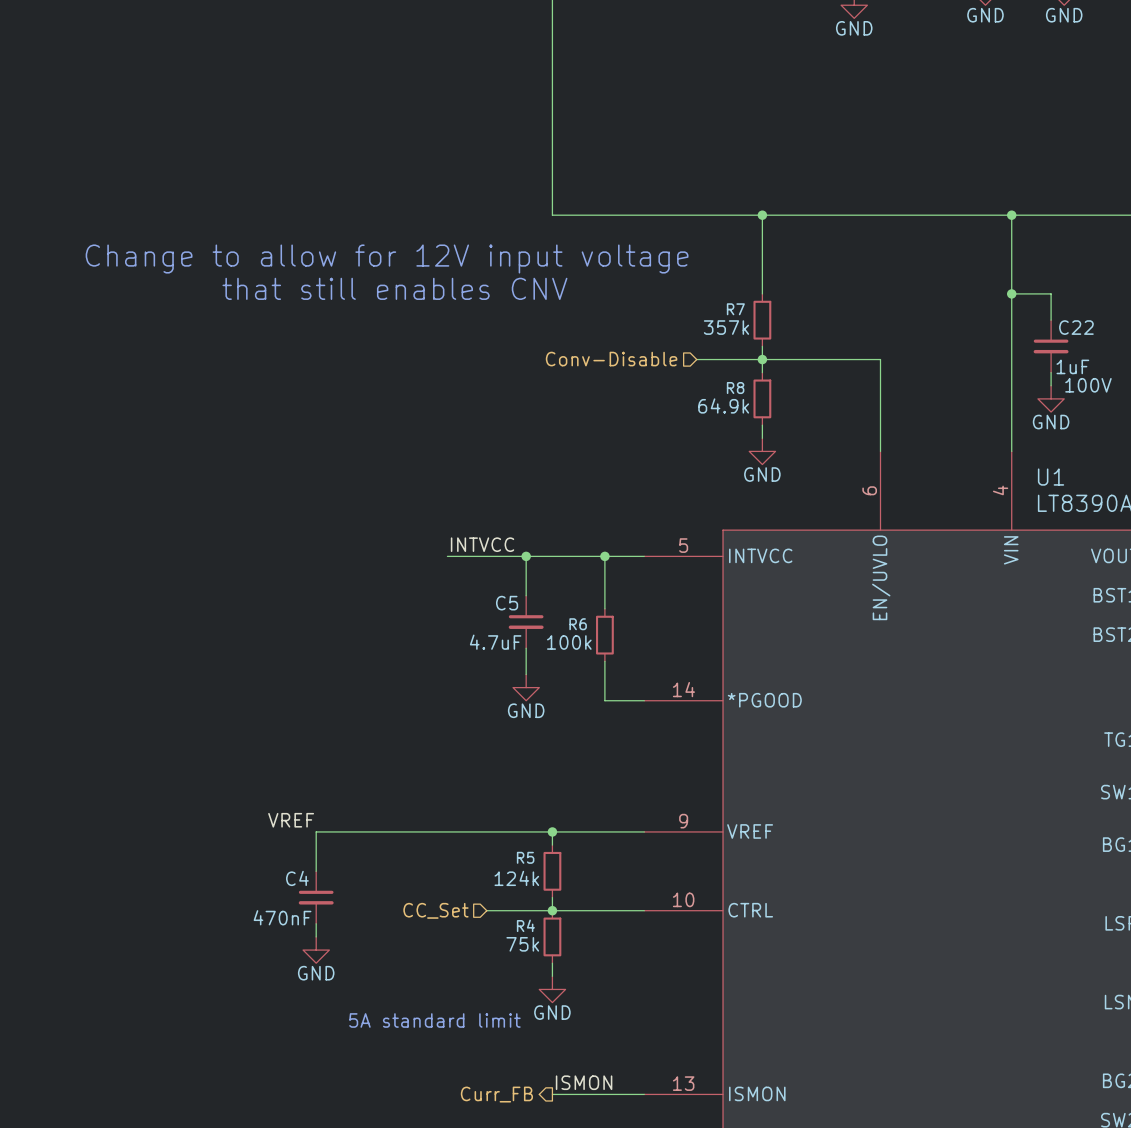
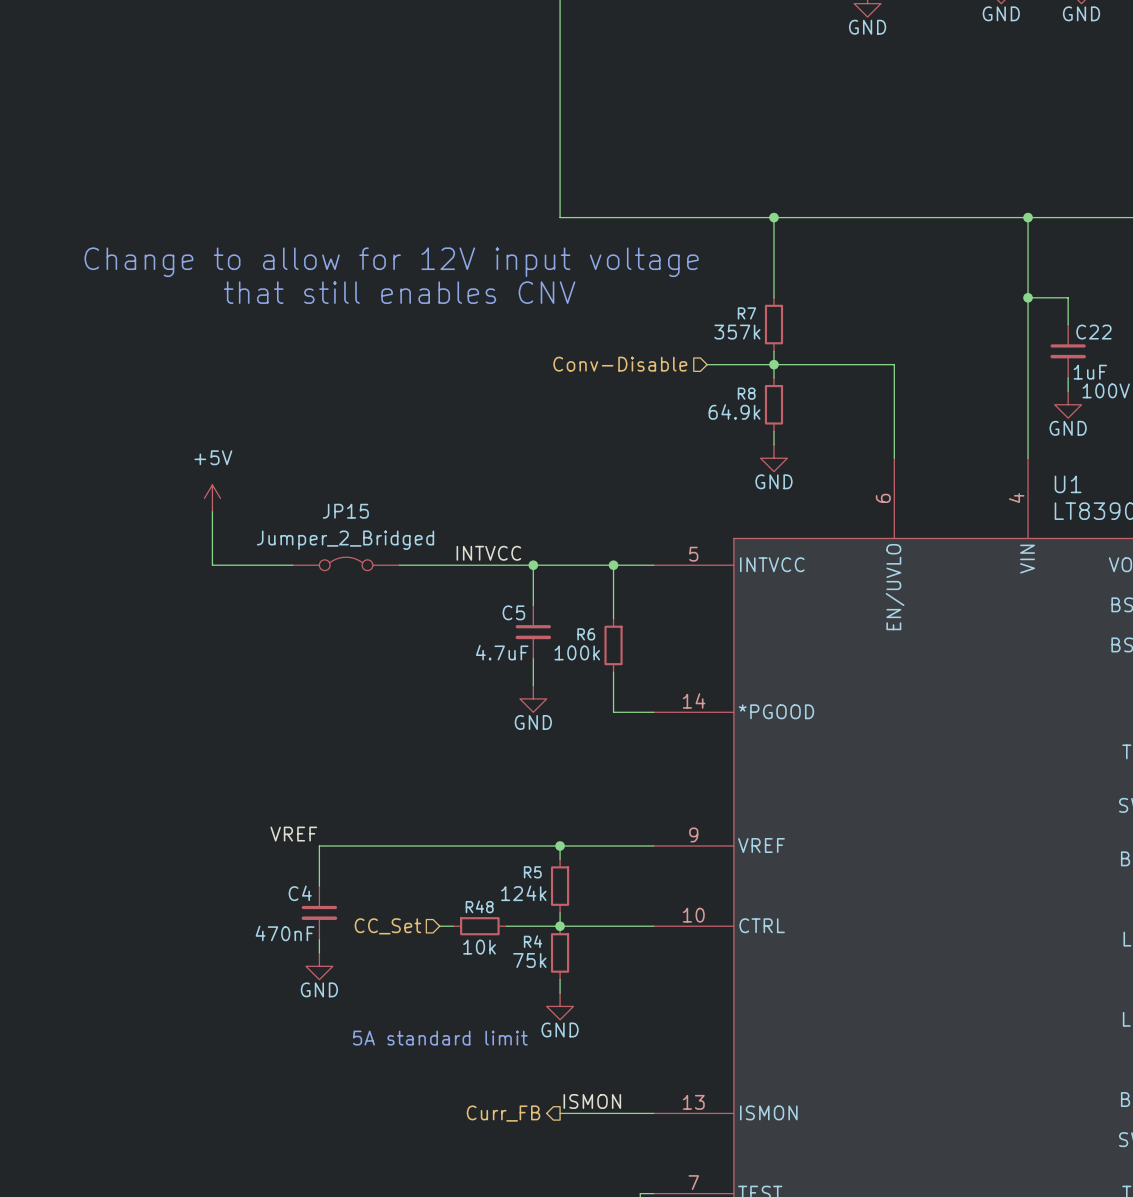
power symbol: none -> +5V (212, 498)
wire: none -> (212, 511) (212, 565) (292, 565)
JP15: none -> Jumper_2_Bridged (346, 563)
wire: none -> (399, 565) (453, 565)
hierarchical label position: CC_Set (435, 910) -> CC_Set (387, 926)
R48: none -> 10k (479, 926)

